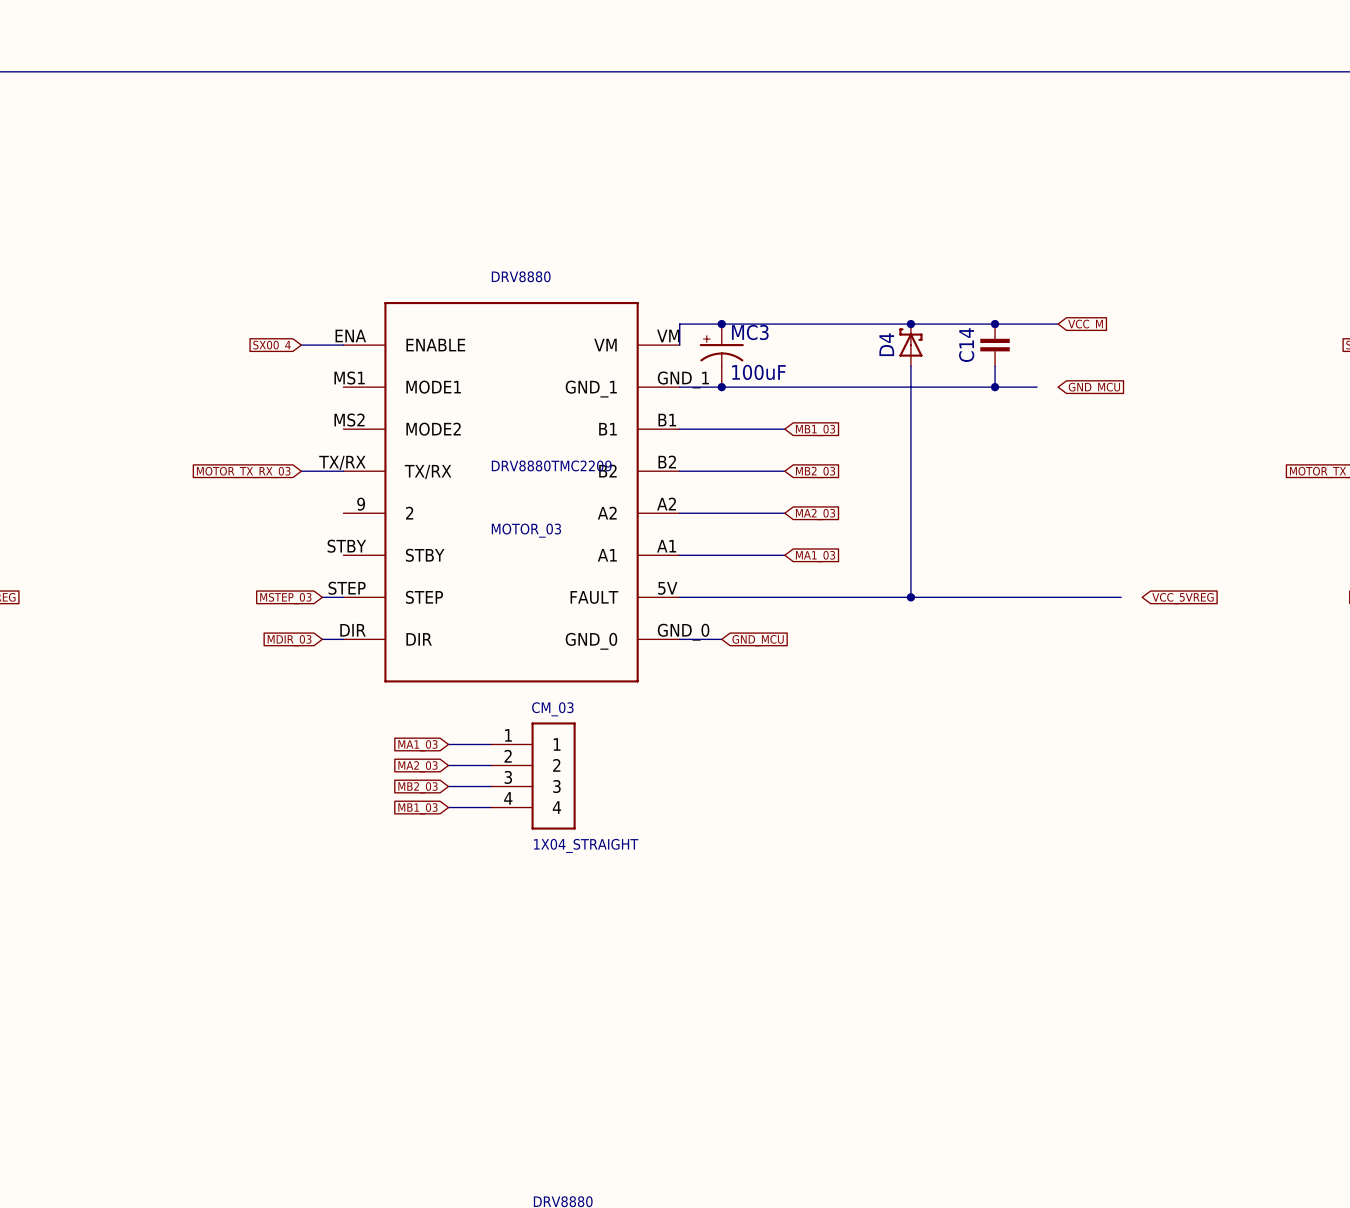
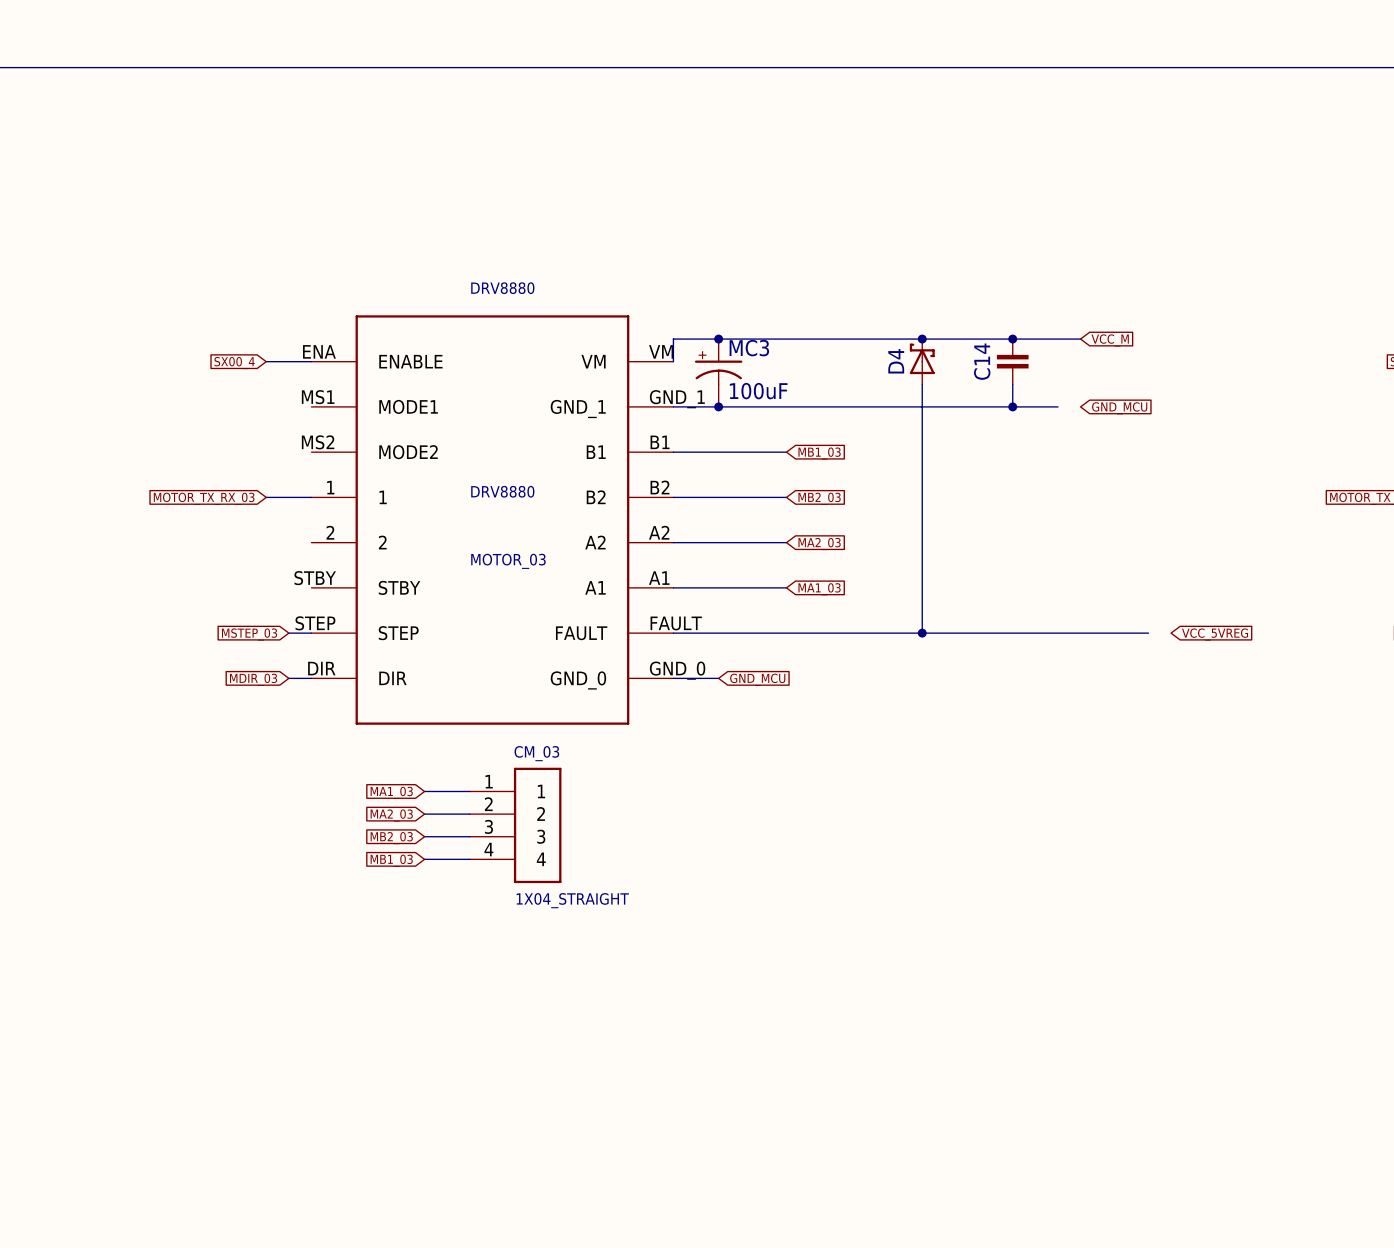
MOTOR_03 pin number: TX/RX (342, 462) -> 1 (330, 487)
MOTOR_03 value: DRV8880TMC2209 (551, 465) -> DRV8880 (502, 491)
MOTOR_03 pin name: TX/RX (428, 472) -> 1 (383, 497)
MOTOR_03 pin number: 9 (361, 504) -> 2 (330, 532)
MOTOR_03 pin number: 5V (667, 588) -> FAULT (676, 623)

